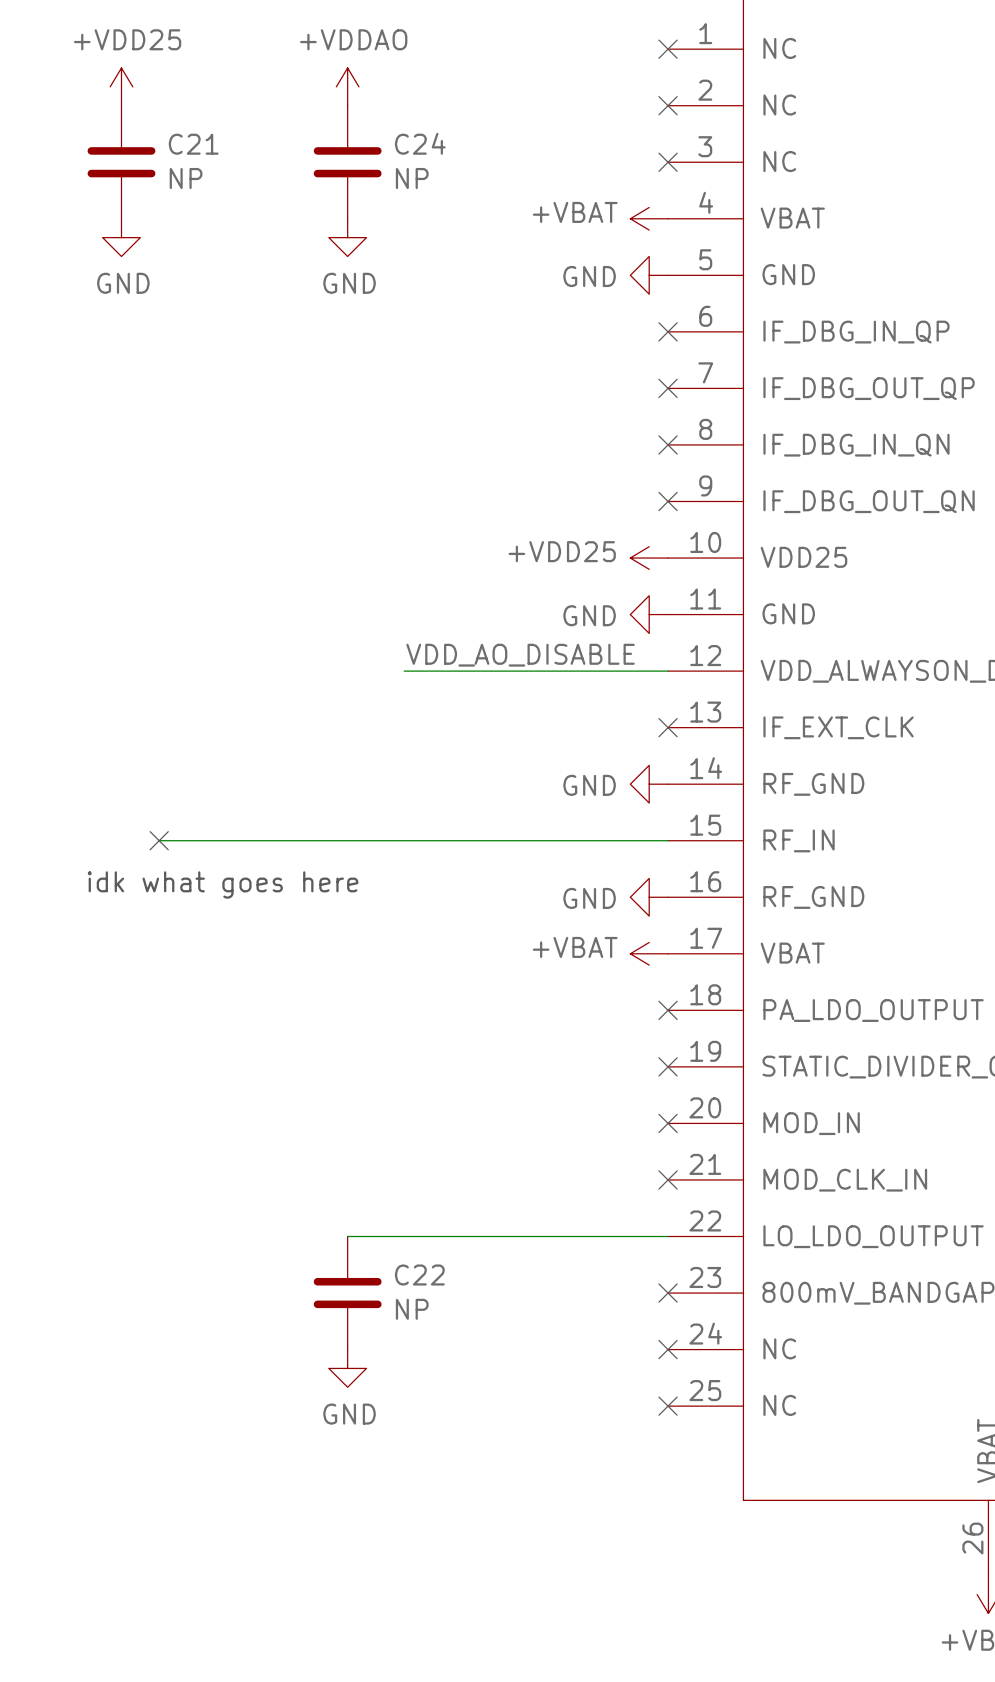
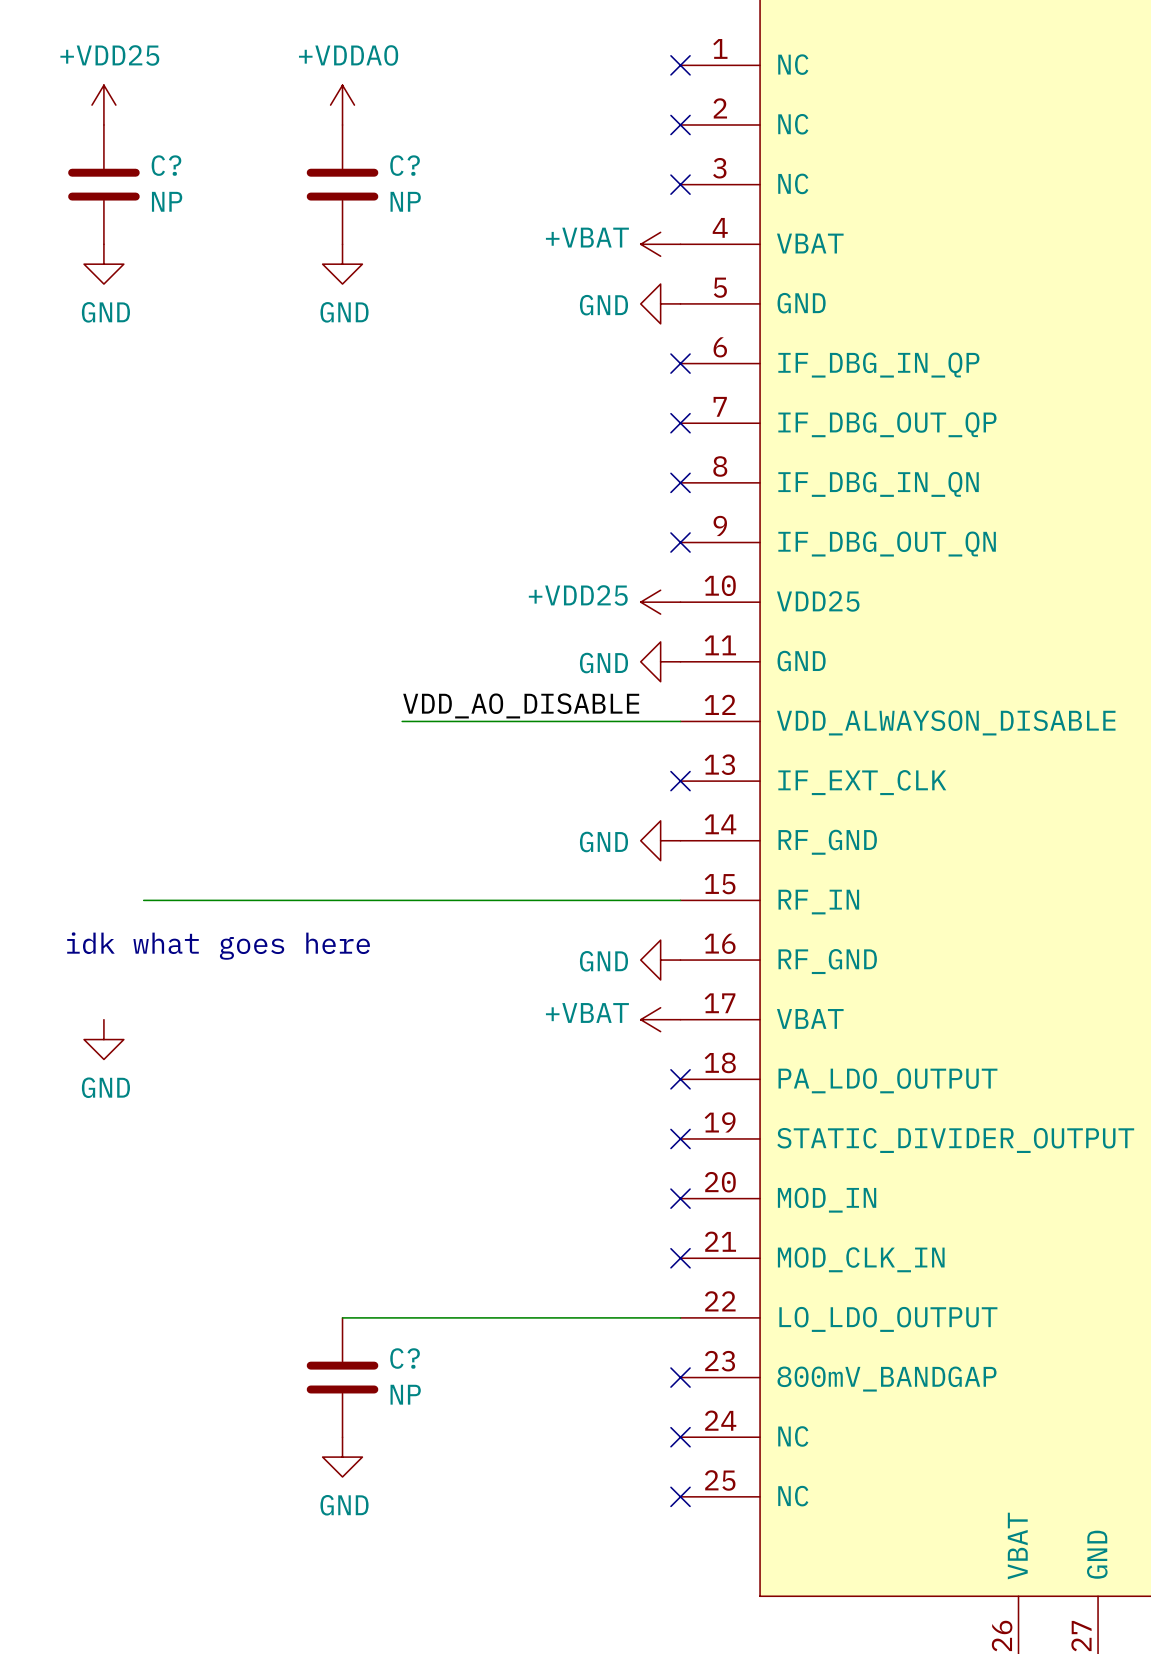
C24 name: C24 (420, 143) -> C? (405, 165)
C21 name: C21 (193, 144) -> C? (166, 165)
no-connect mark: (159, 840) -> none
power symbol: none -> GND (103, 1039)
C22 name: C22 (419, 1275) -> C? (405, 1358)

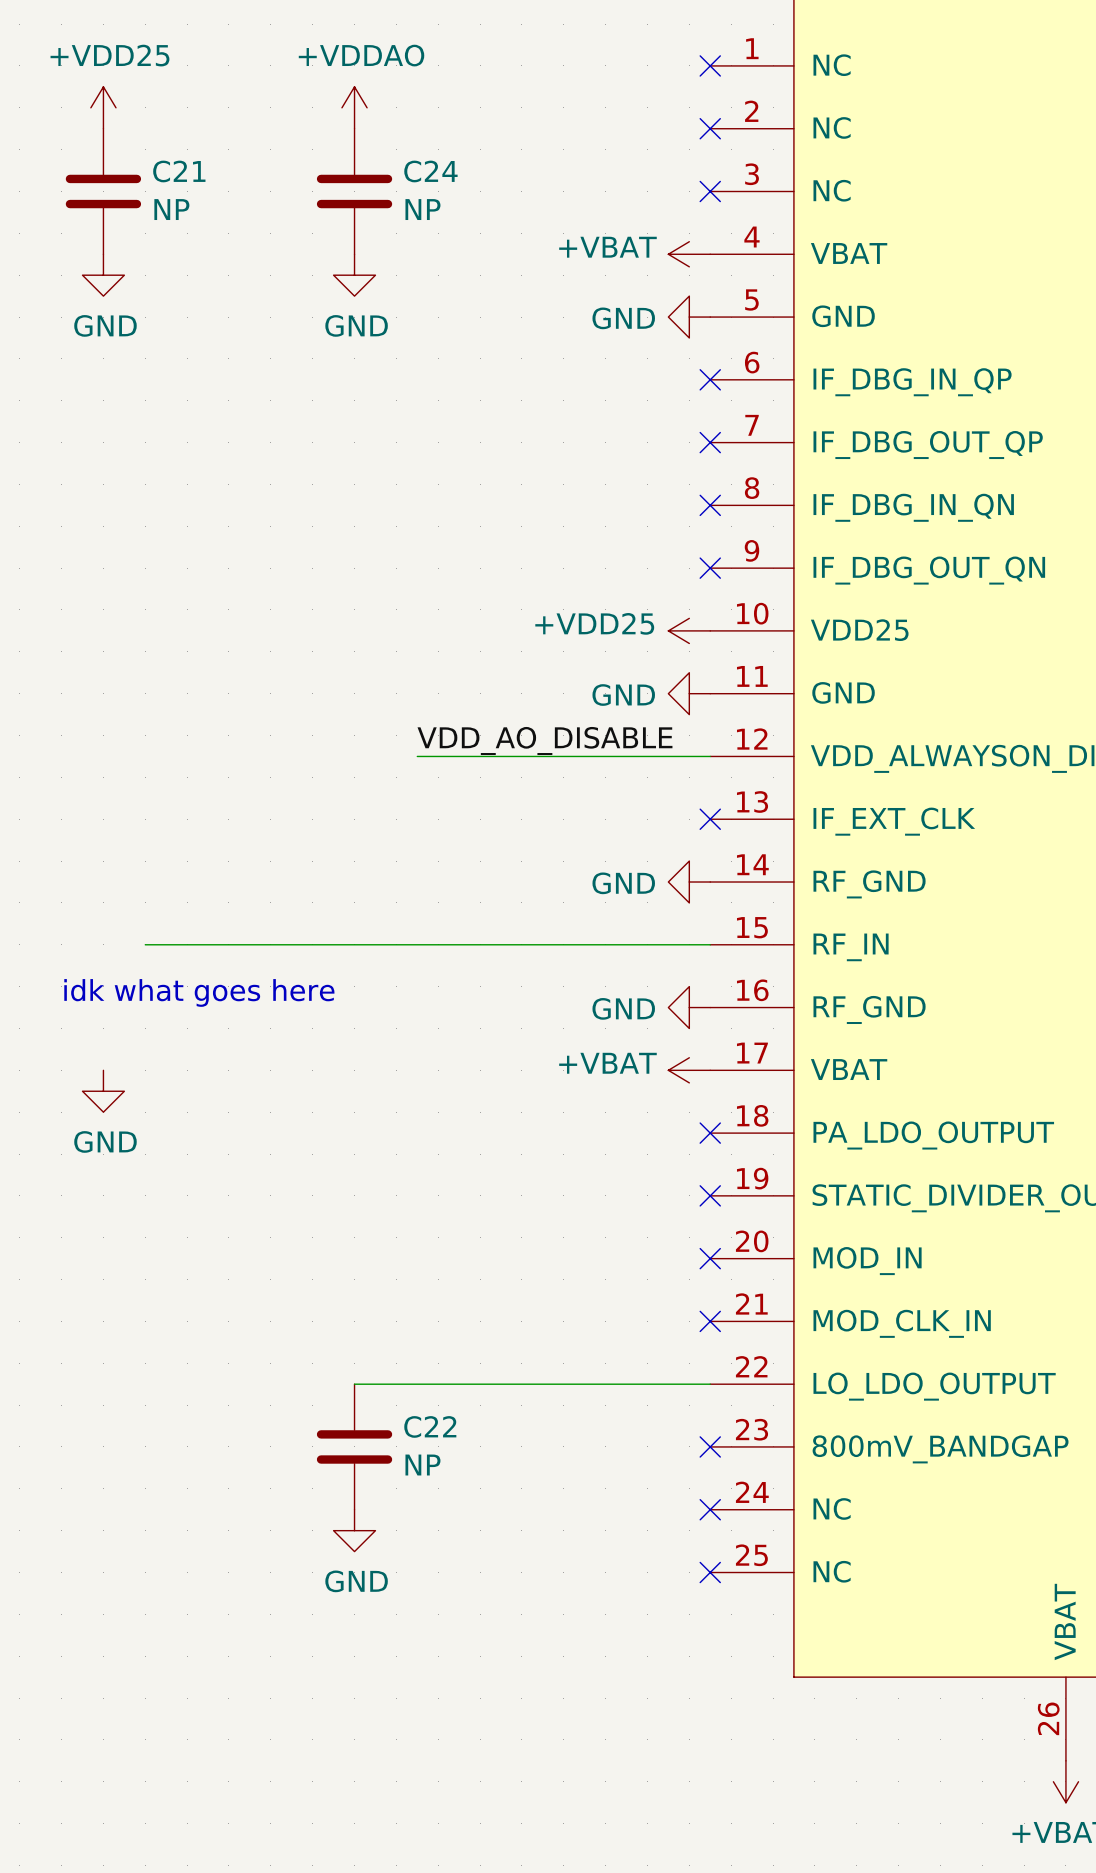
C? name: C? (166, 165) -> C21 (179, 171)
C? name: C? (405, 165) -> C24 (430, 171)
C? name: C? (405, 1358) -> C22 (430, 1426)

